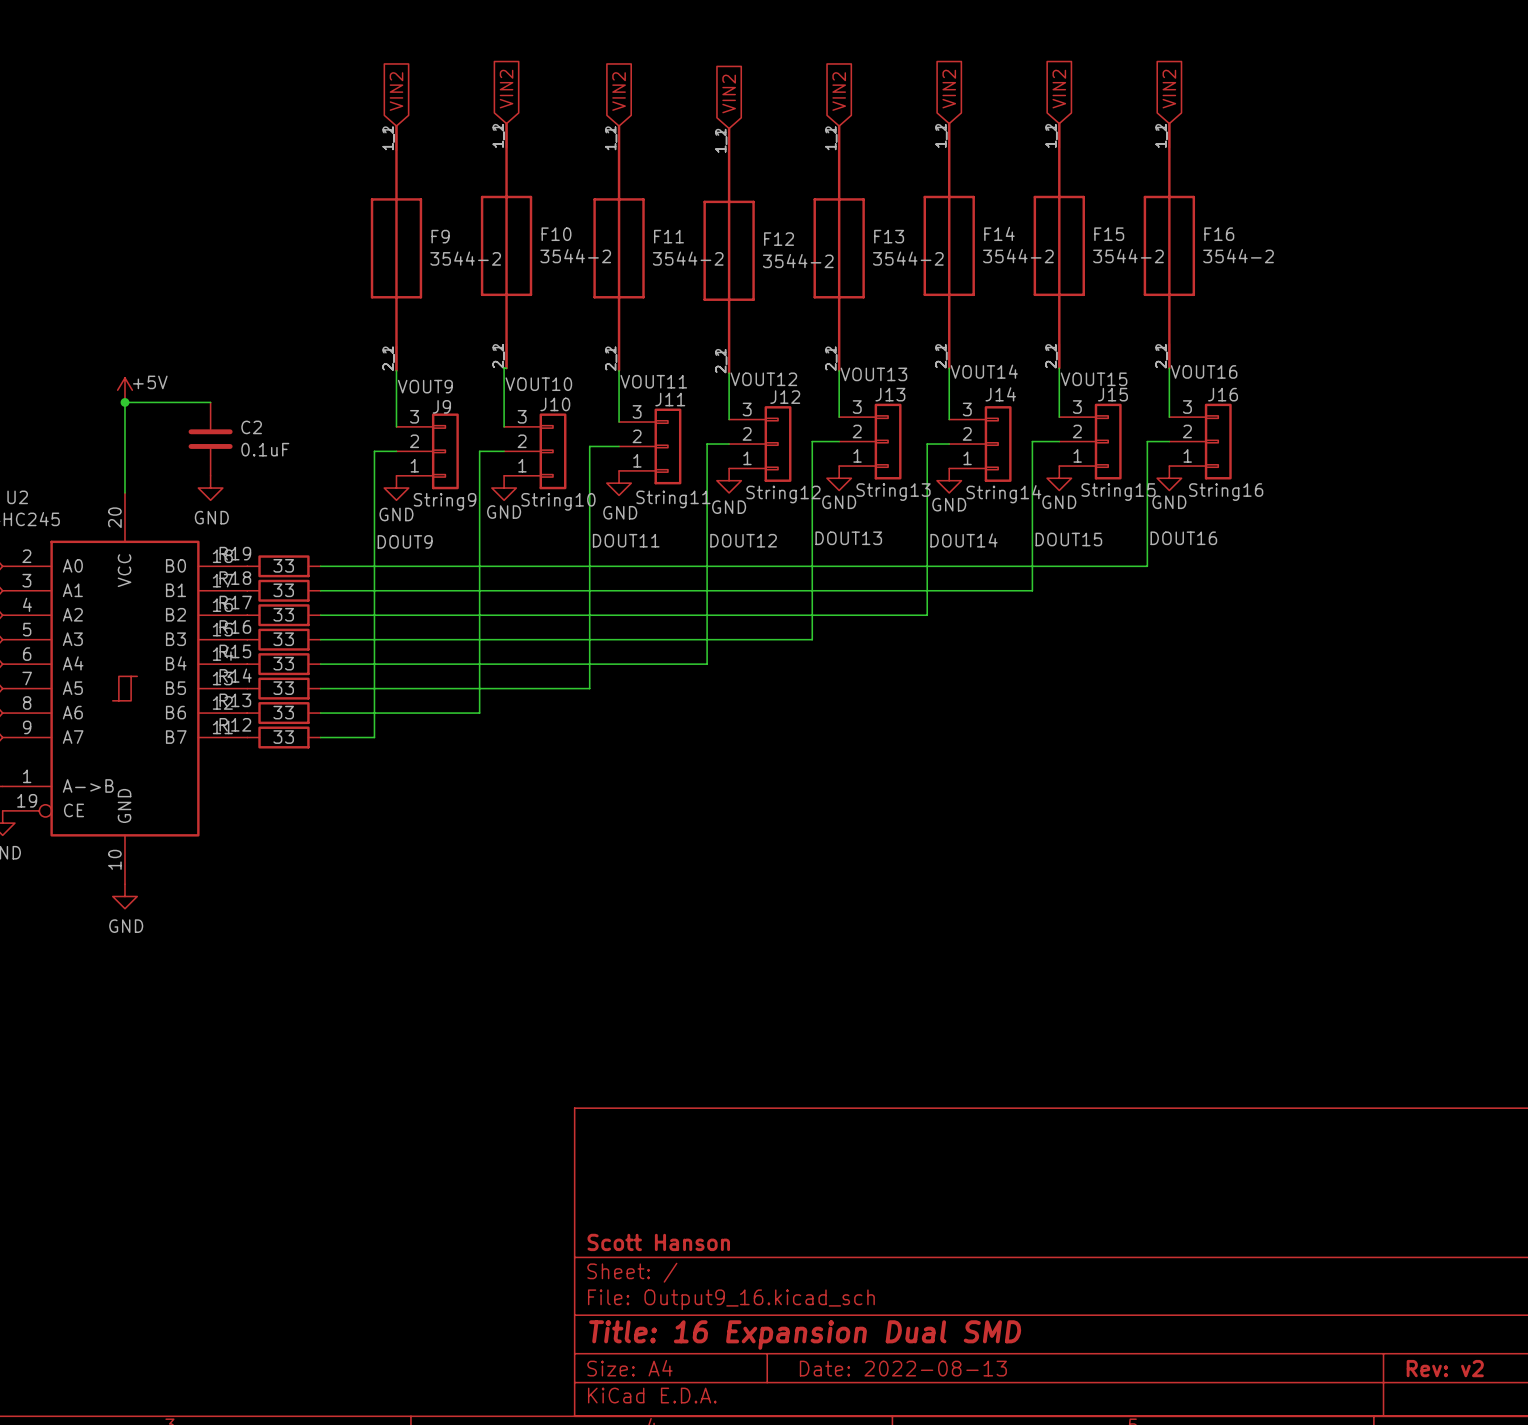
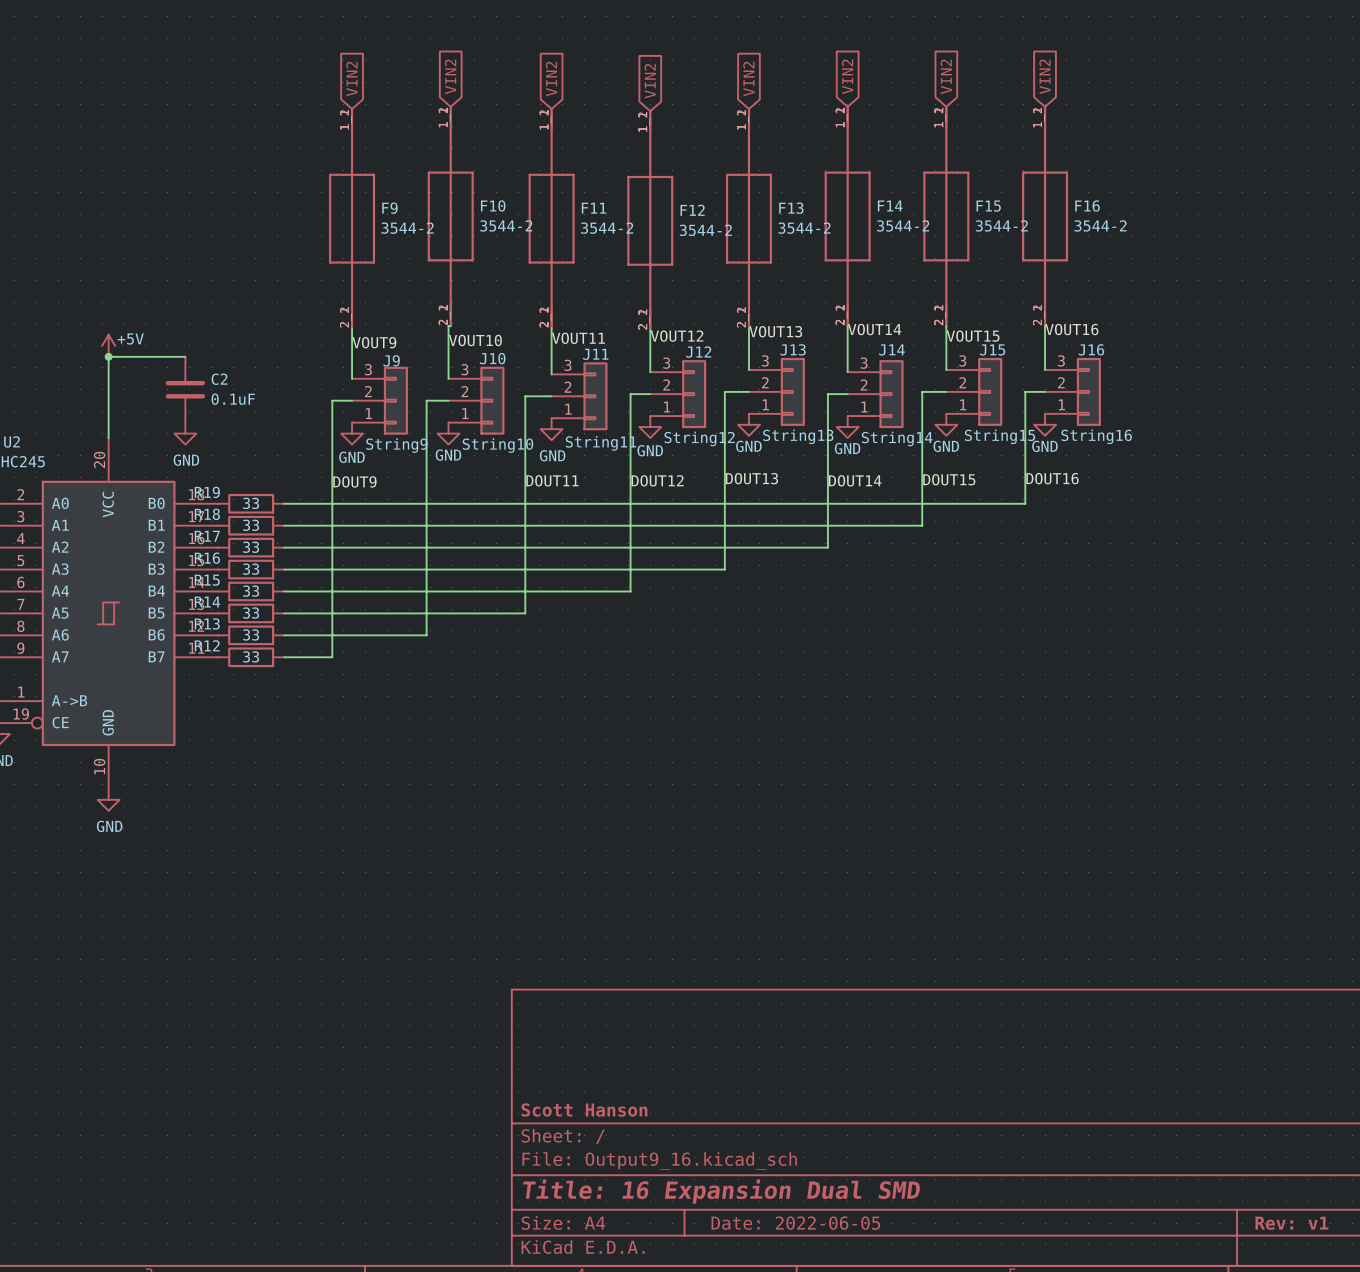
title block: Date: 2022-08-13 (903, 1368) -> Date: 2022-06-05 (795, 1223)
title block: Rev: v2 (1445, 1368) -> Rev: v1 (1291, 1223)

